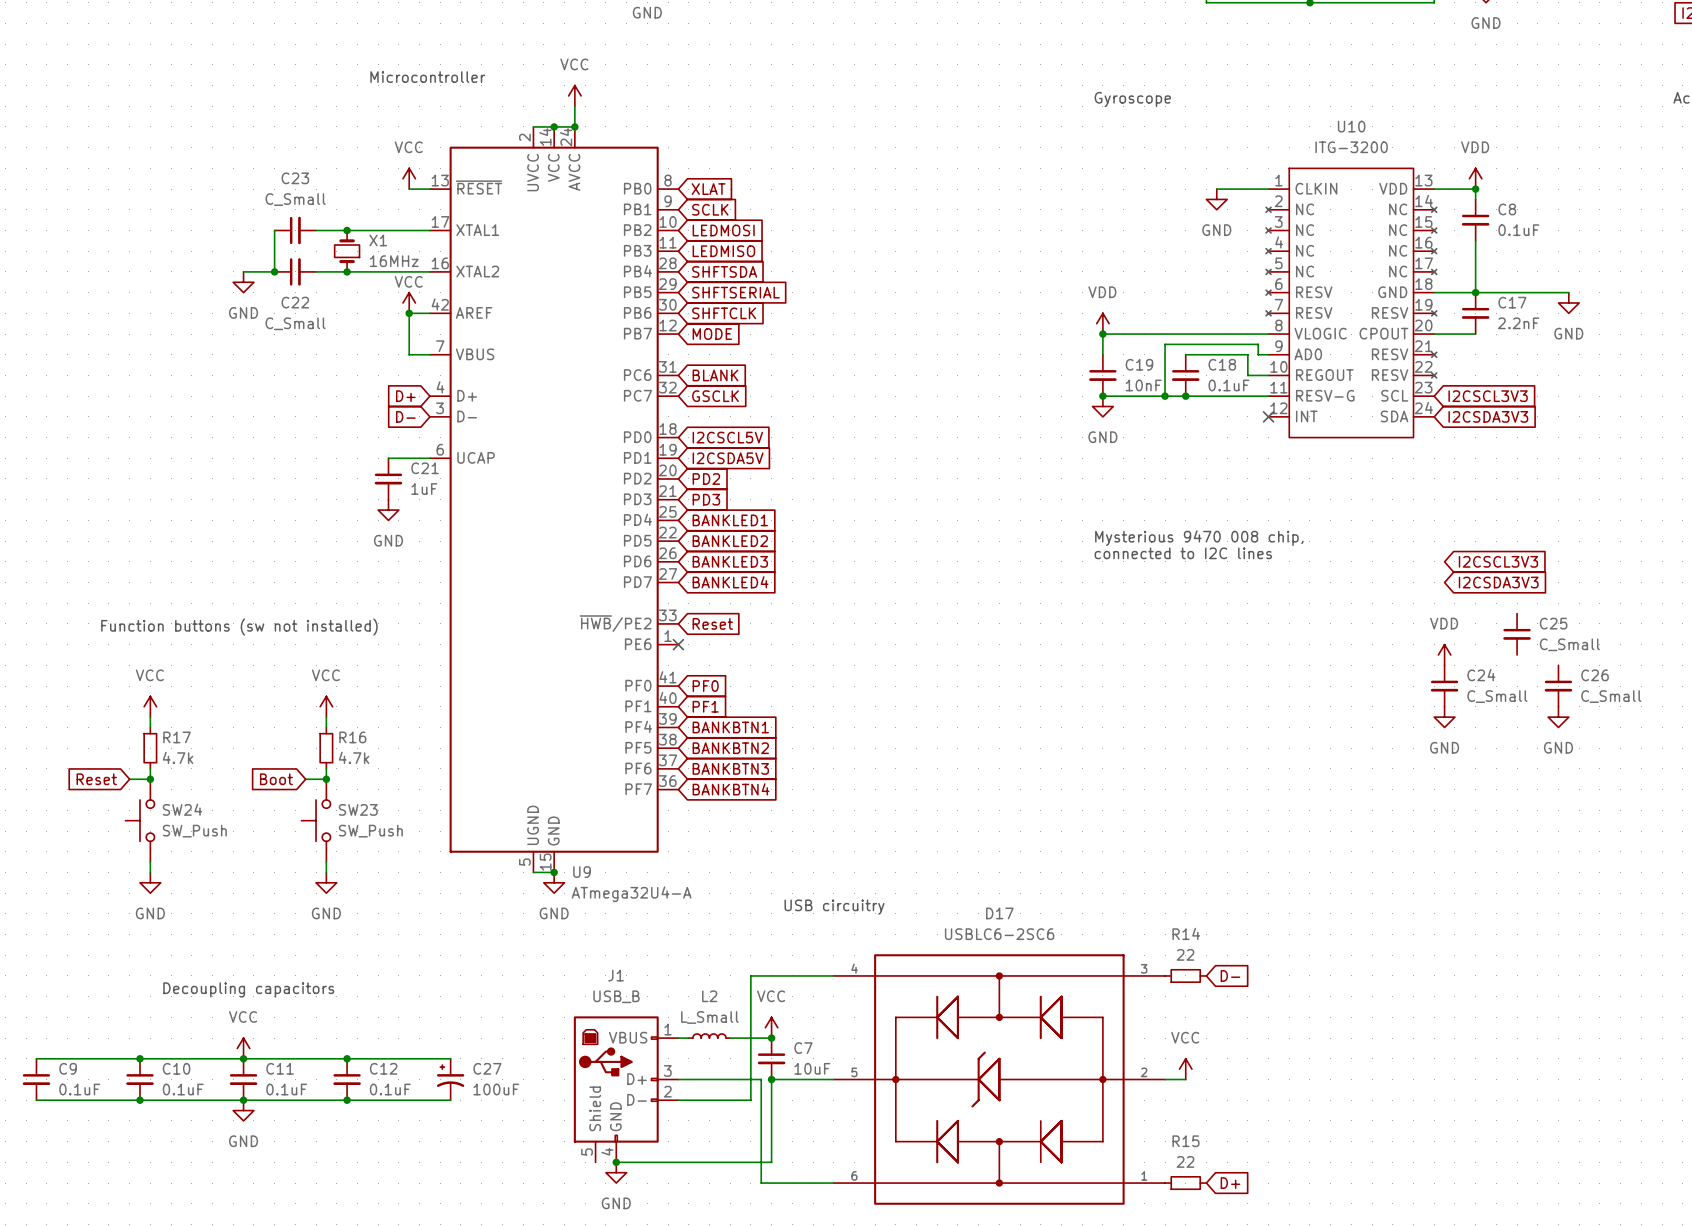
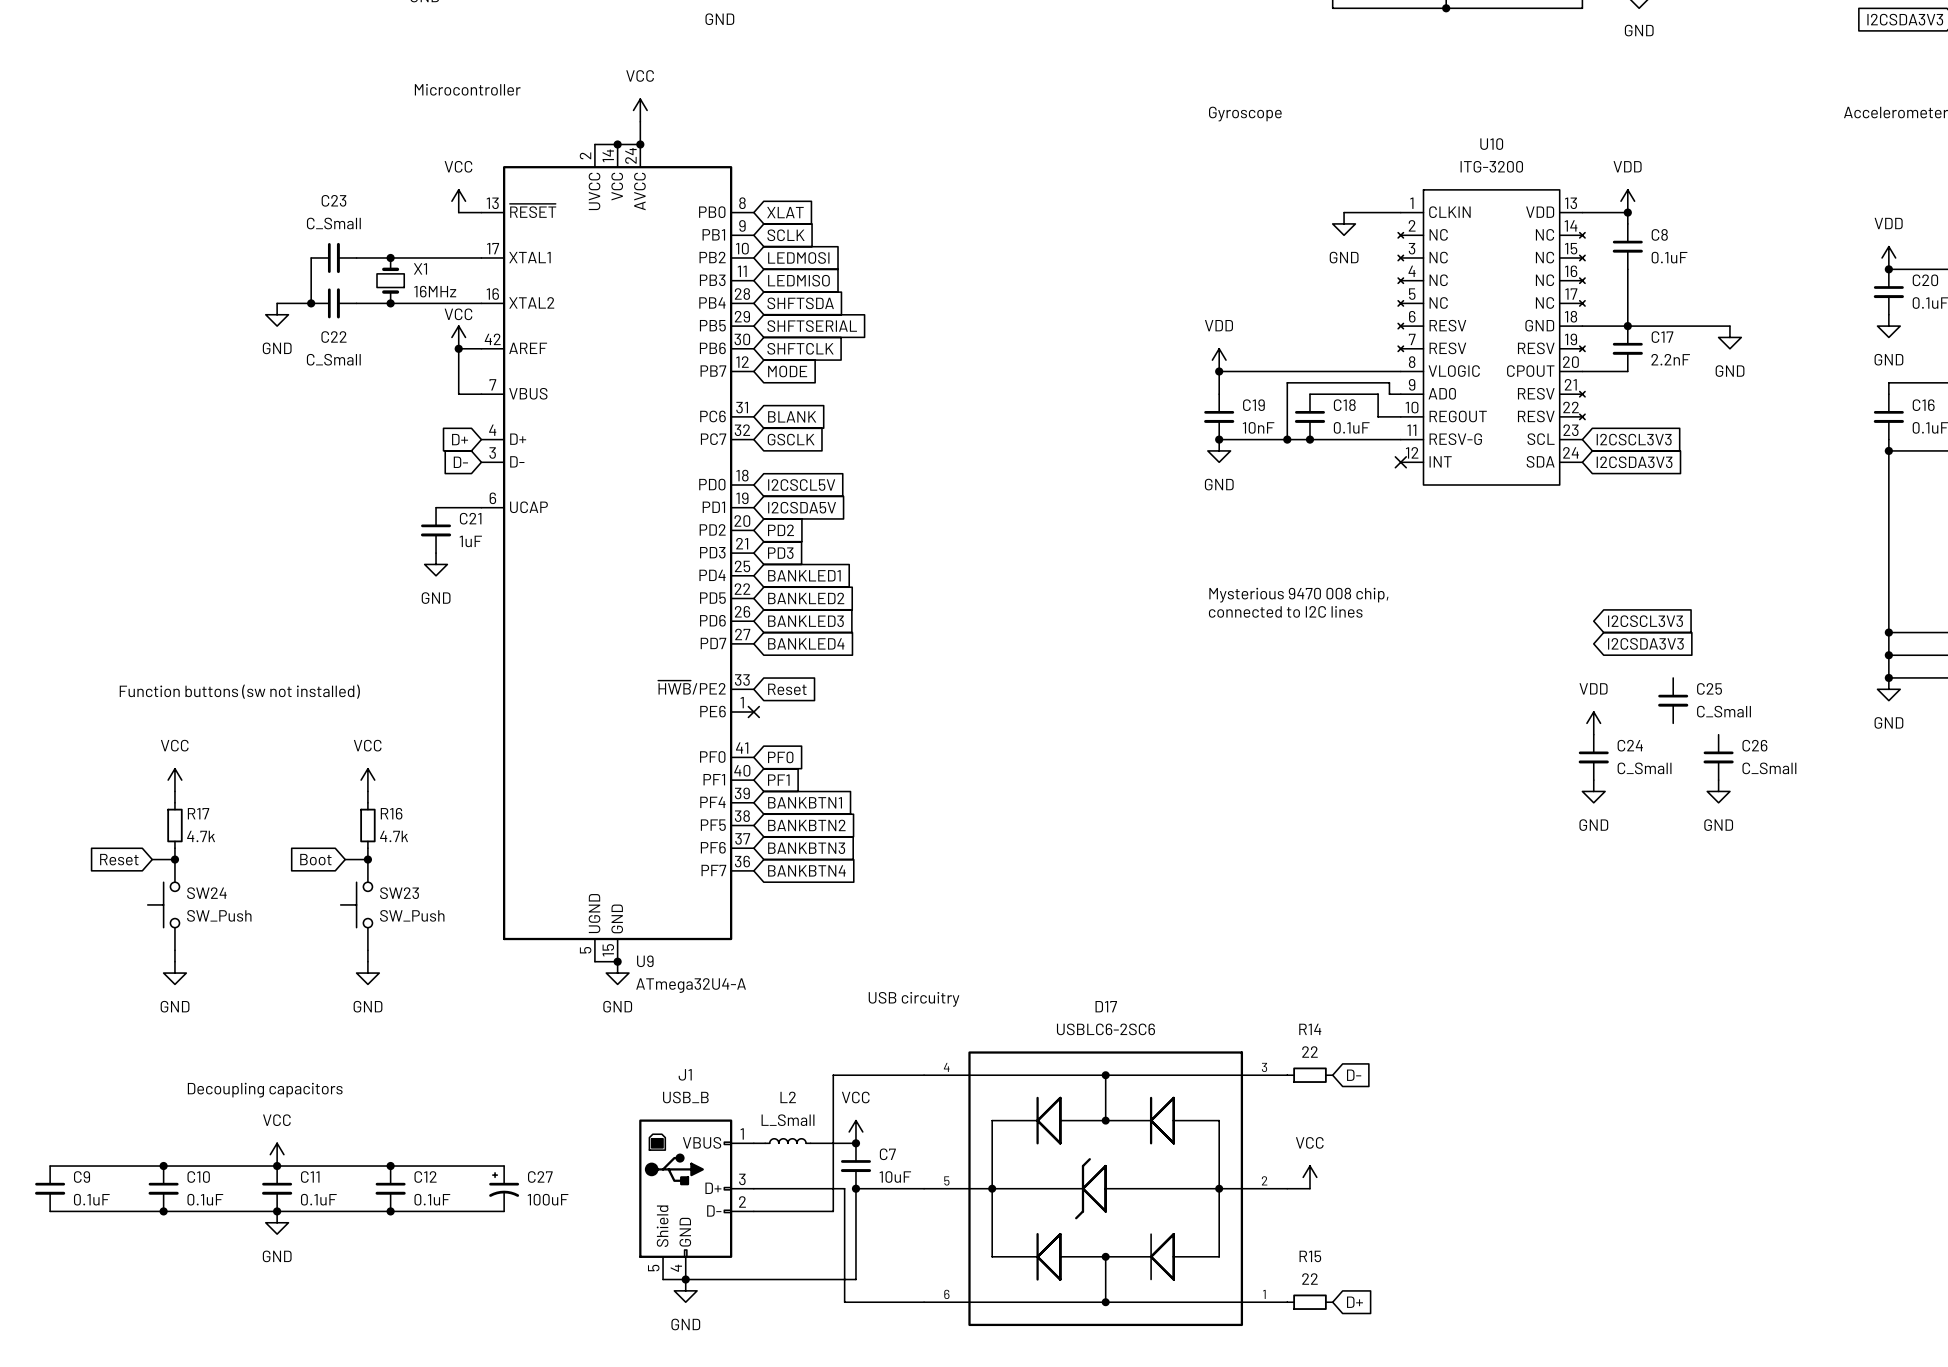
wire: none -> (663, 1279) (685, 1279)

